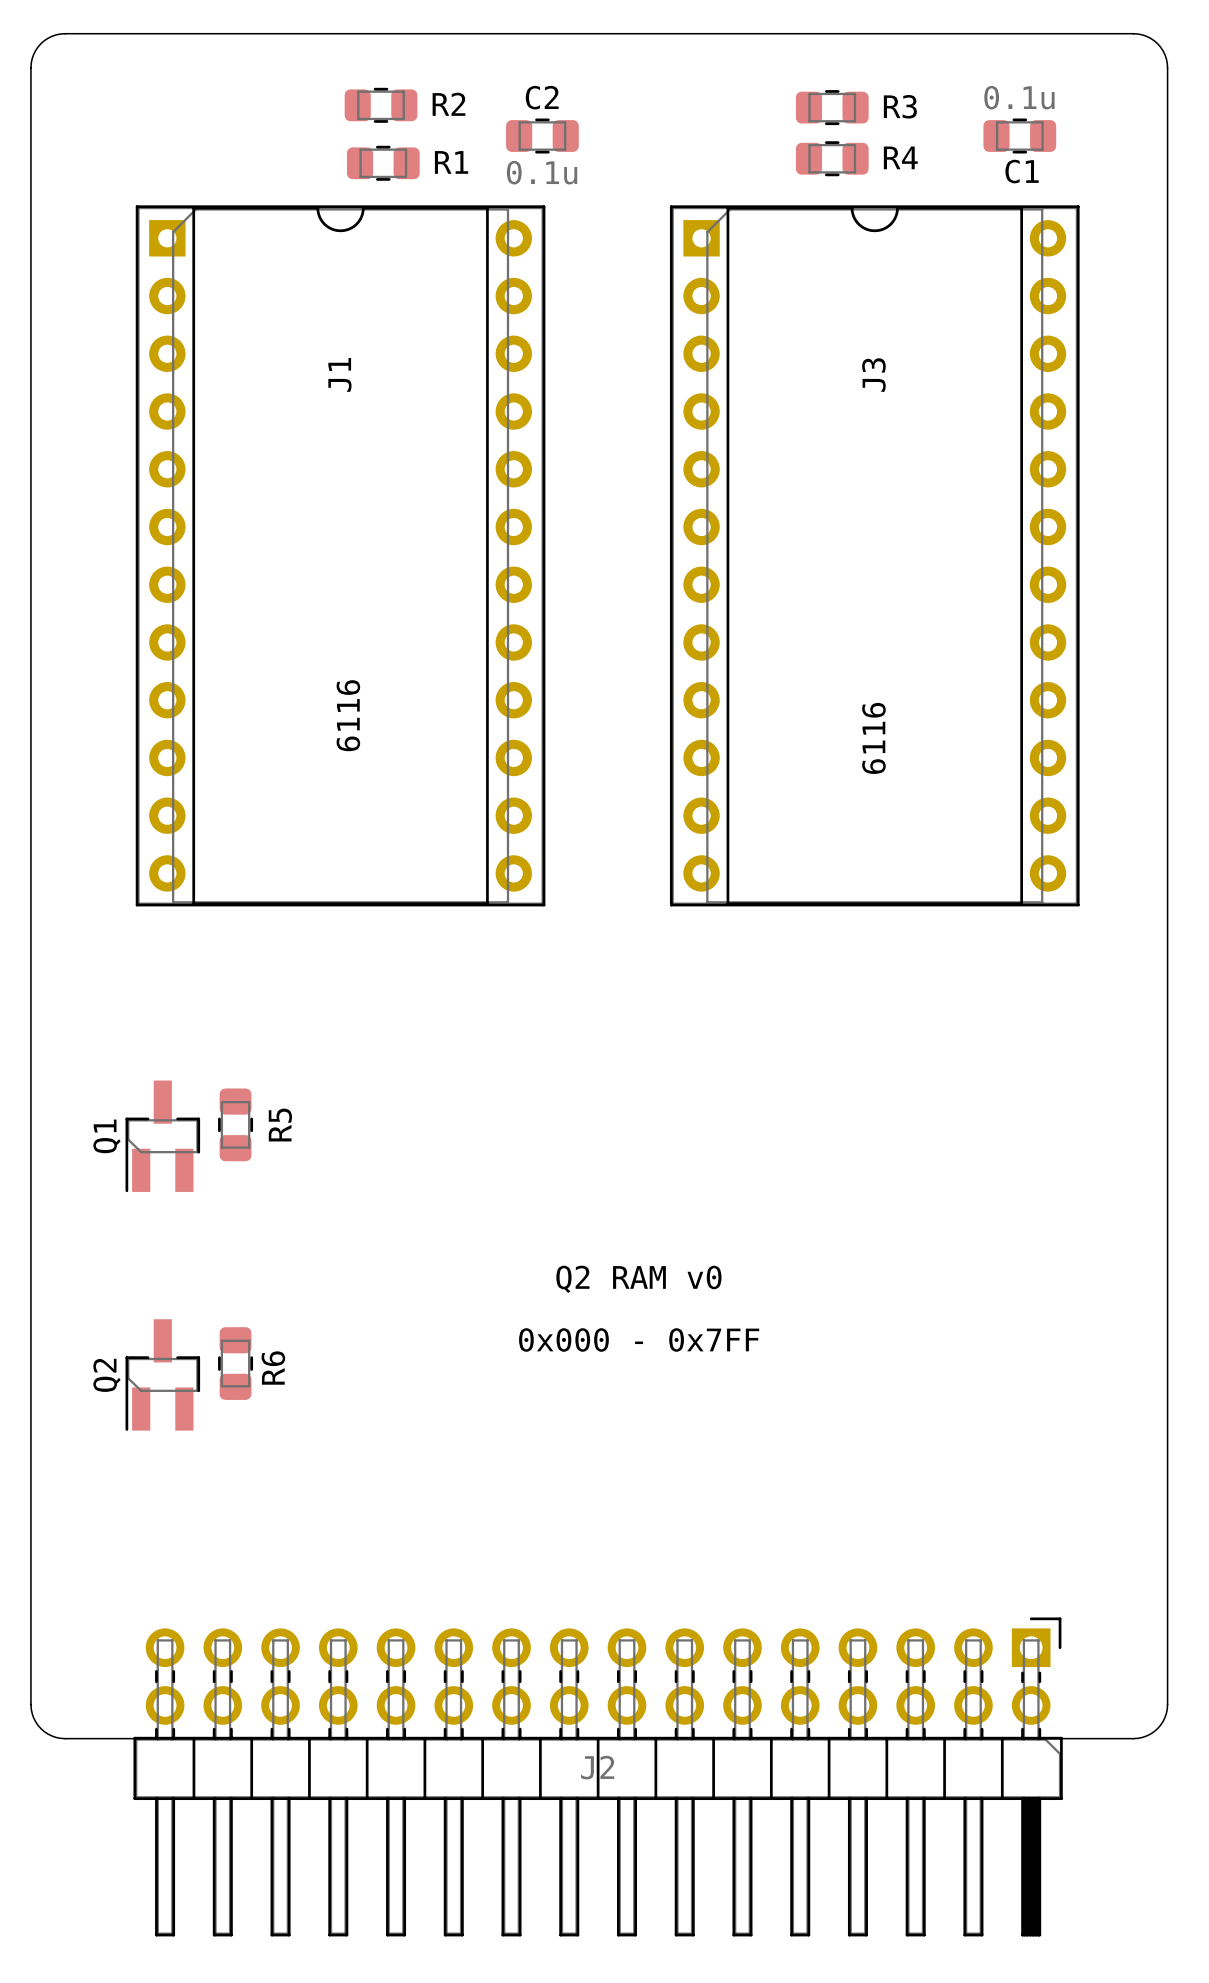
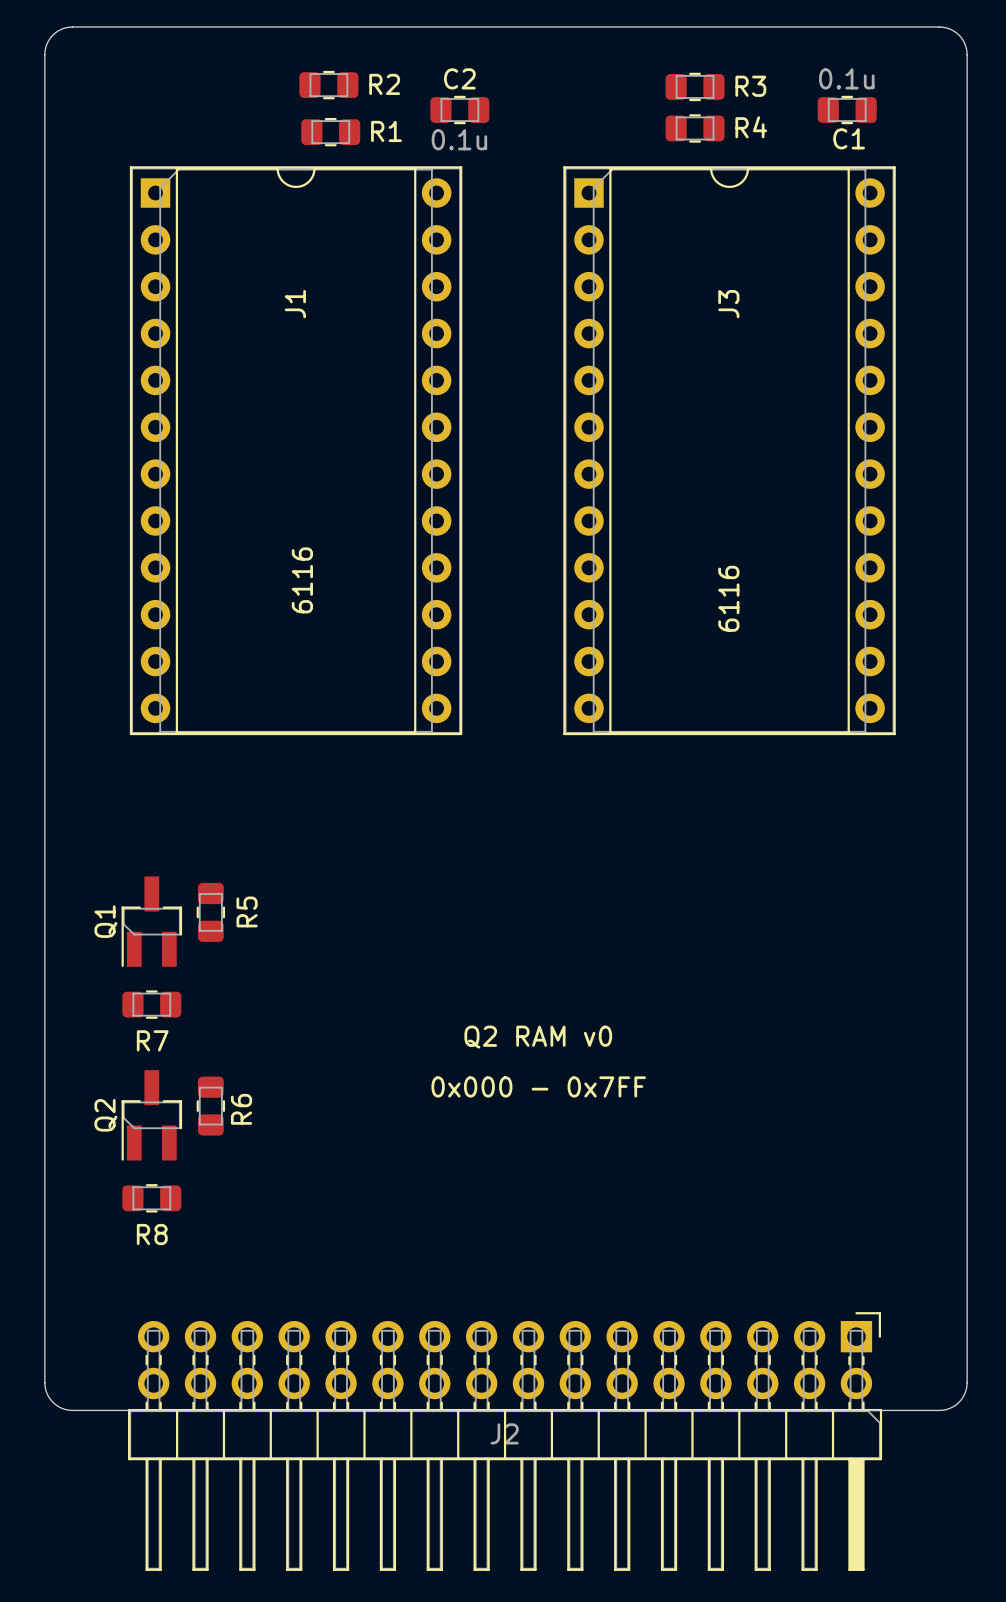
R7: none -> (151, 1004)
R8: none -> (151, 1198)

